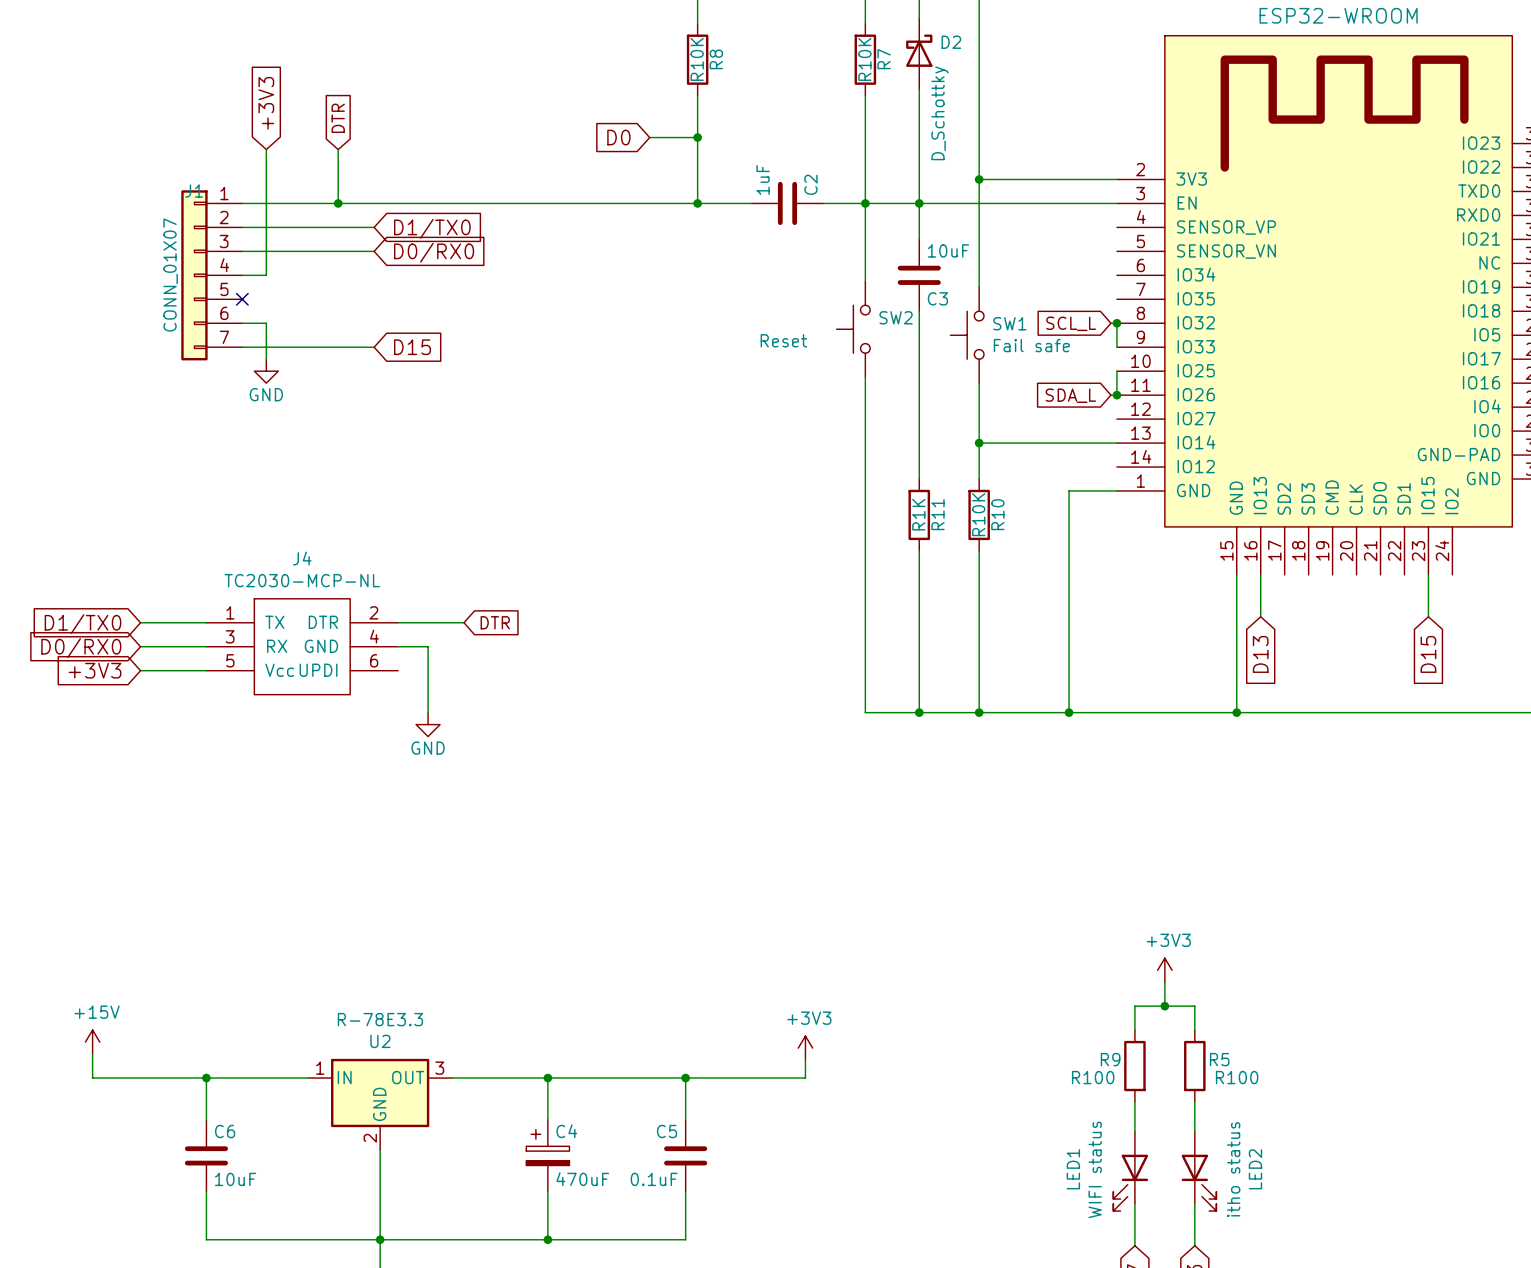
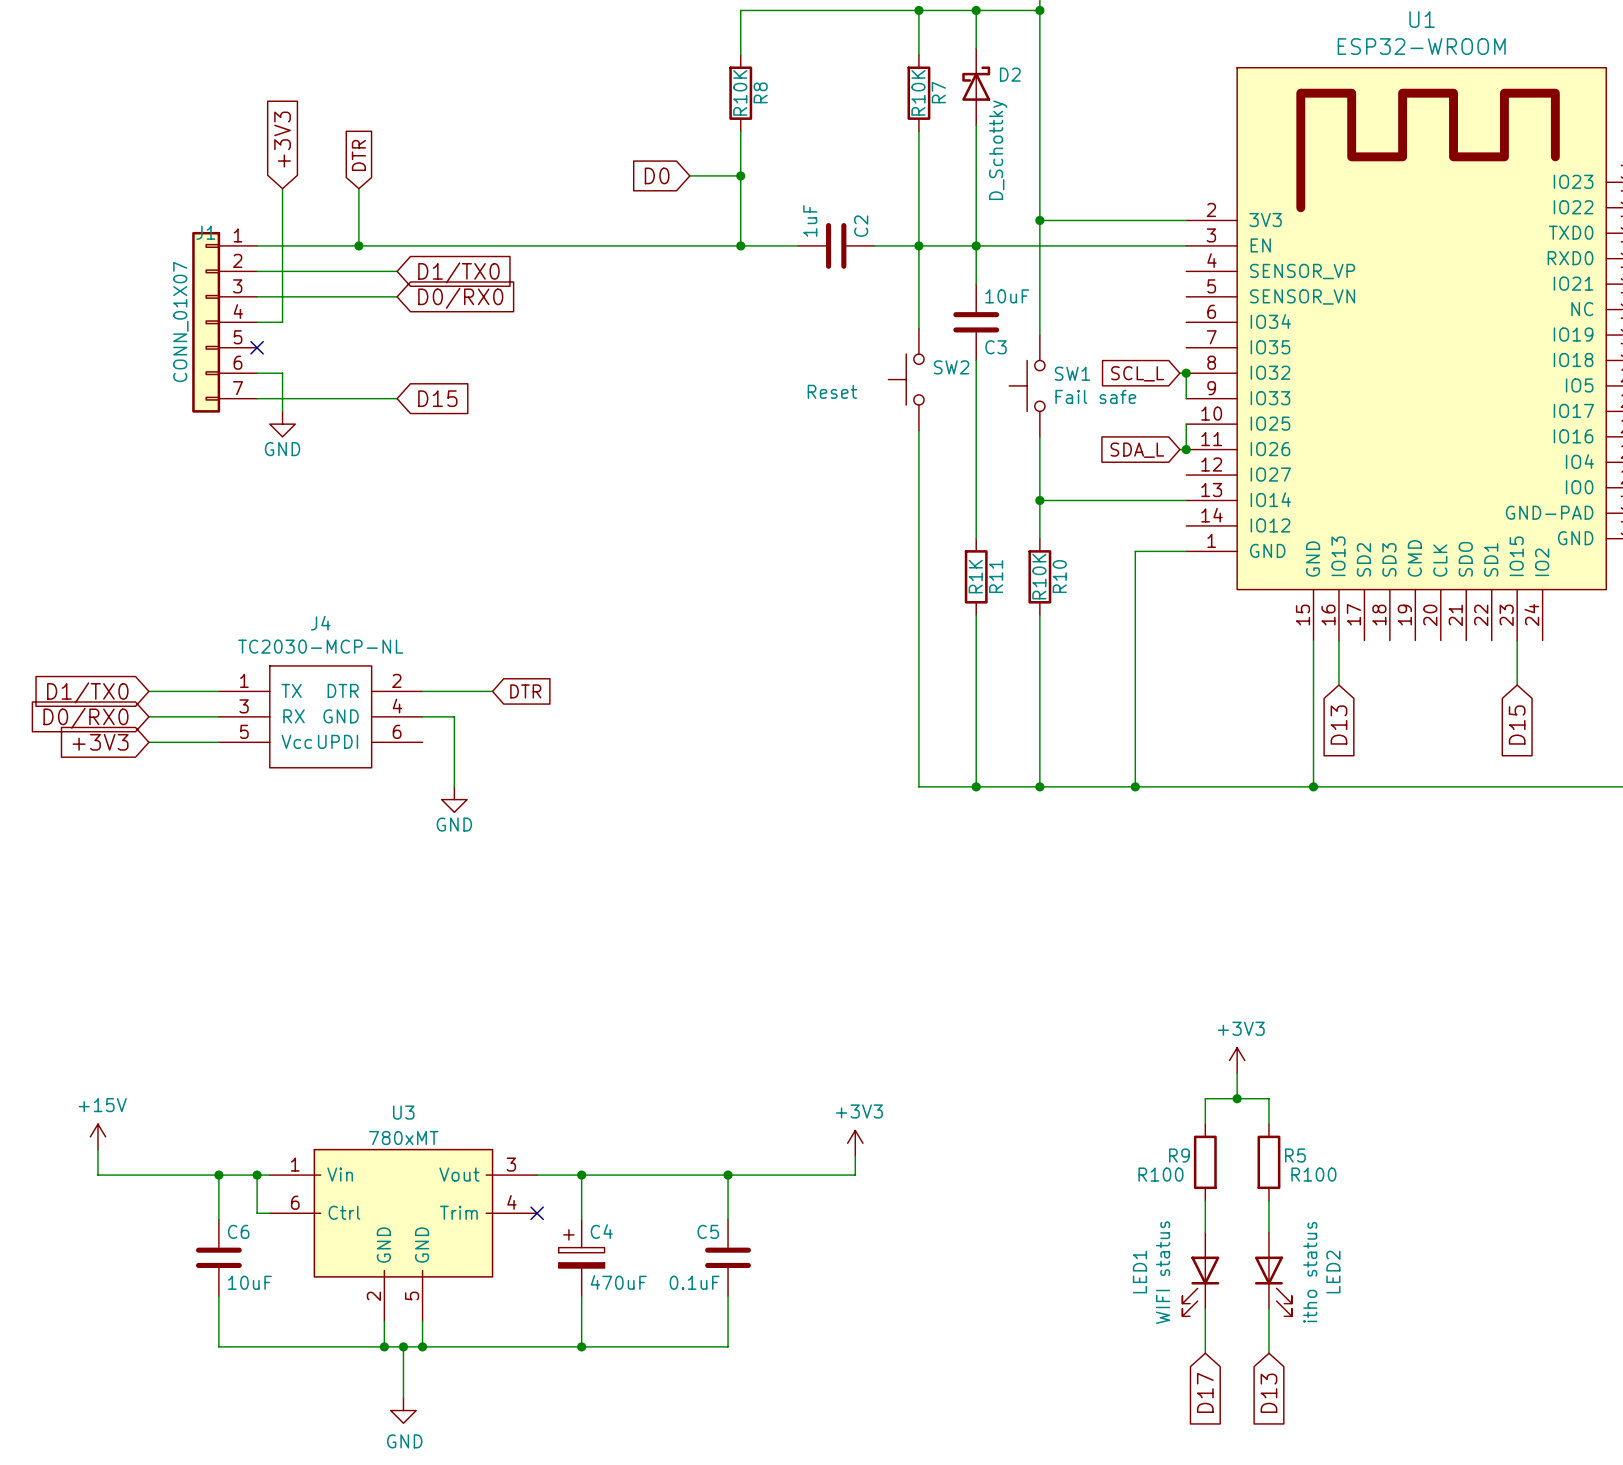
wire: none -> (257, 1175) (257, 1213) (269, 1213)
junction: none -> (257, 1175)
R-78E3.3: U2 (380, 1104) -> none
no-connect mark: none -> (537, 1213)
U3: none -> 780xMT (403, 1235)
wire: (380, 1149) (380, 1239) -> none
wire: none -> (384, 1321) (384, 1346)
wire: none -> (422, 1321) (422, 1346)
junction: none -> (384, 1346)
junction: none -> (422, 1346)

